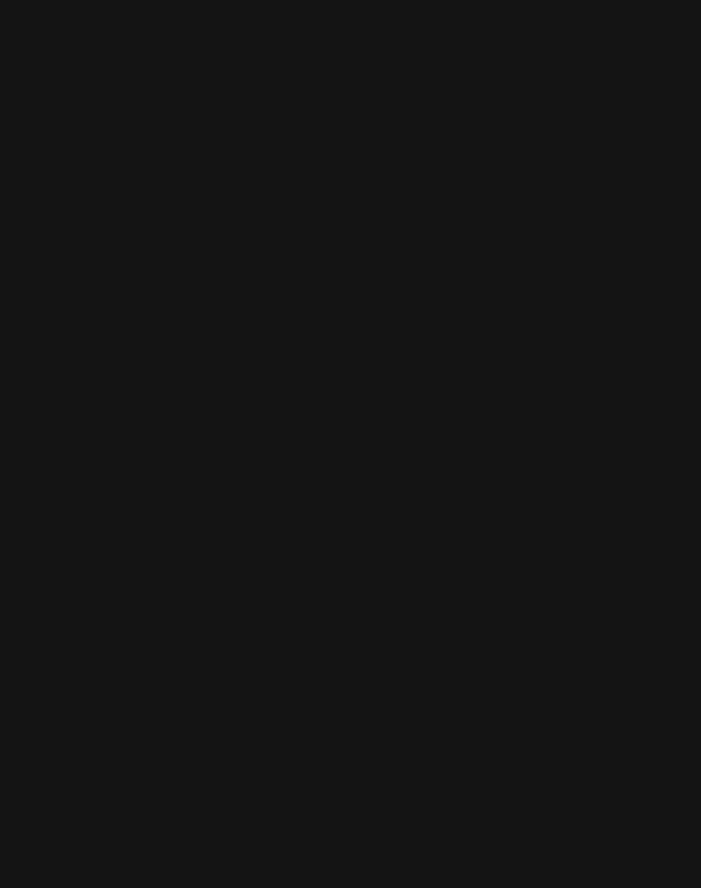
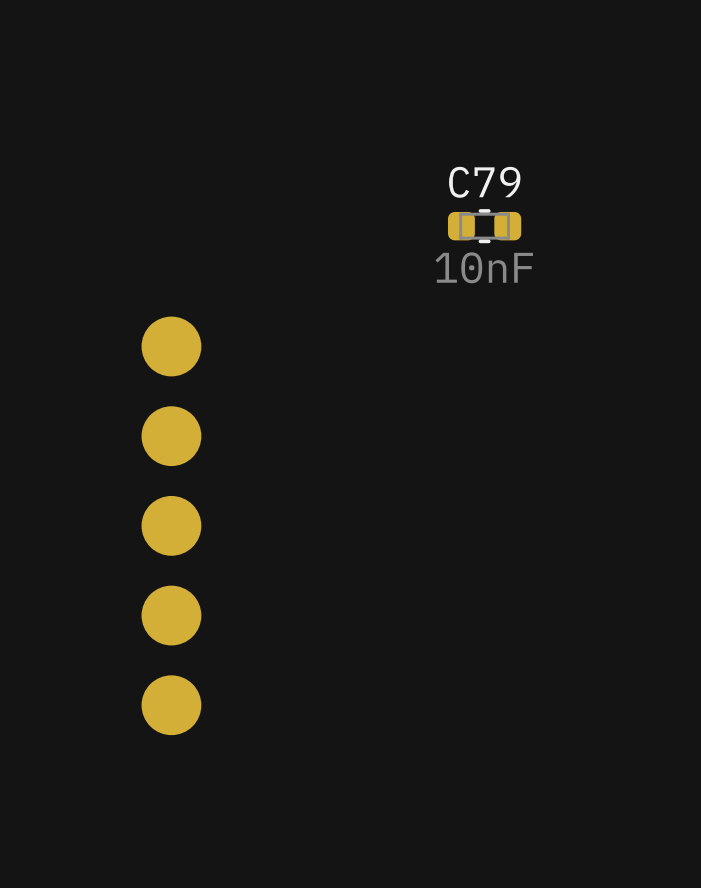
C79: none -> 10nF (484, 226)
part: none -> (171, 346)
part: none -> (171, 436)
part: none -> (171, 525)
part: none -> (171, 615)
part: none -> (171, 705)

